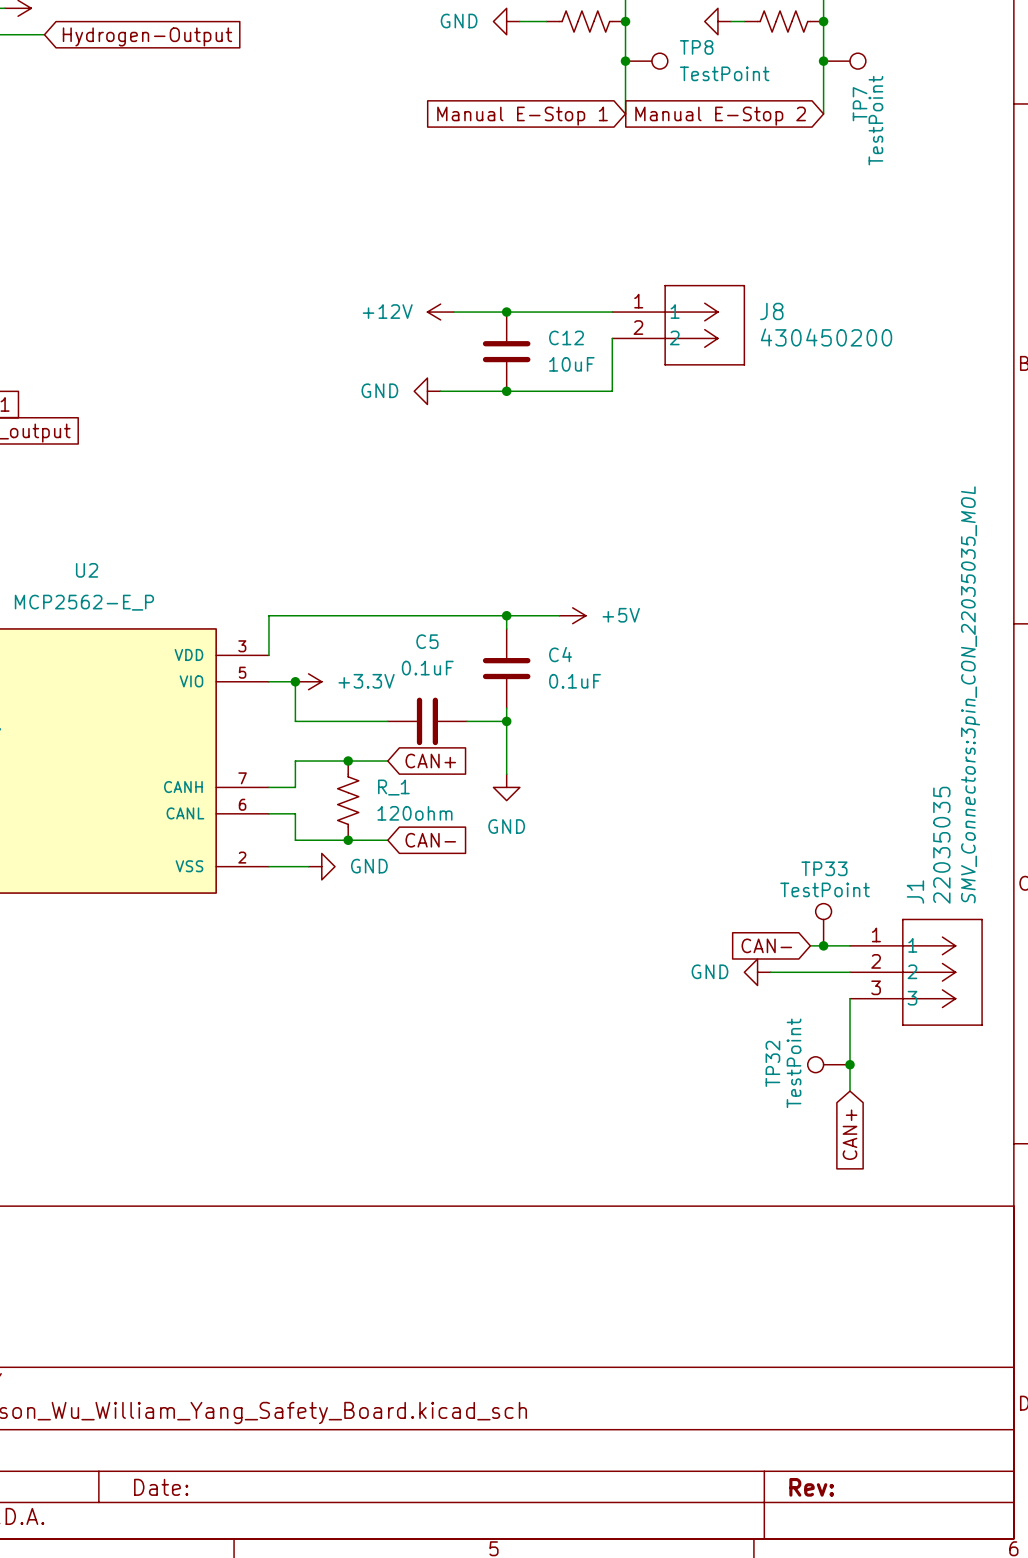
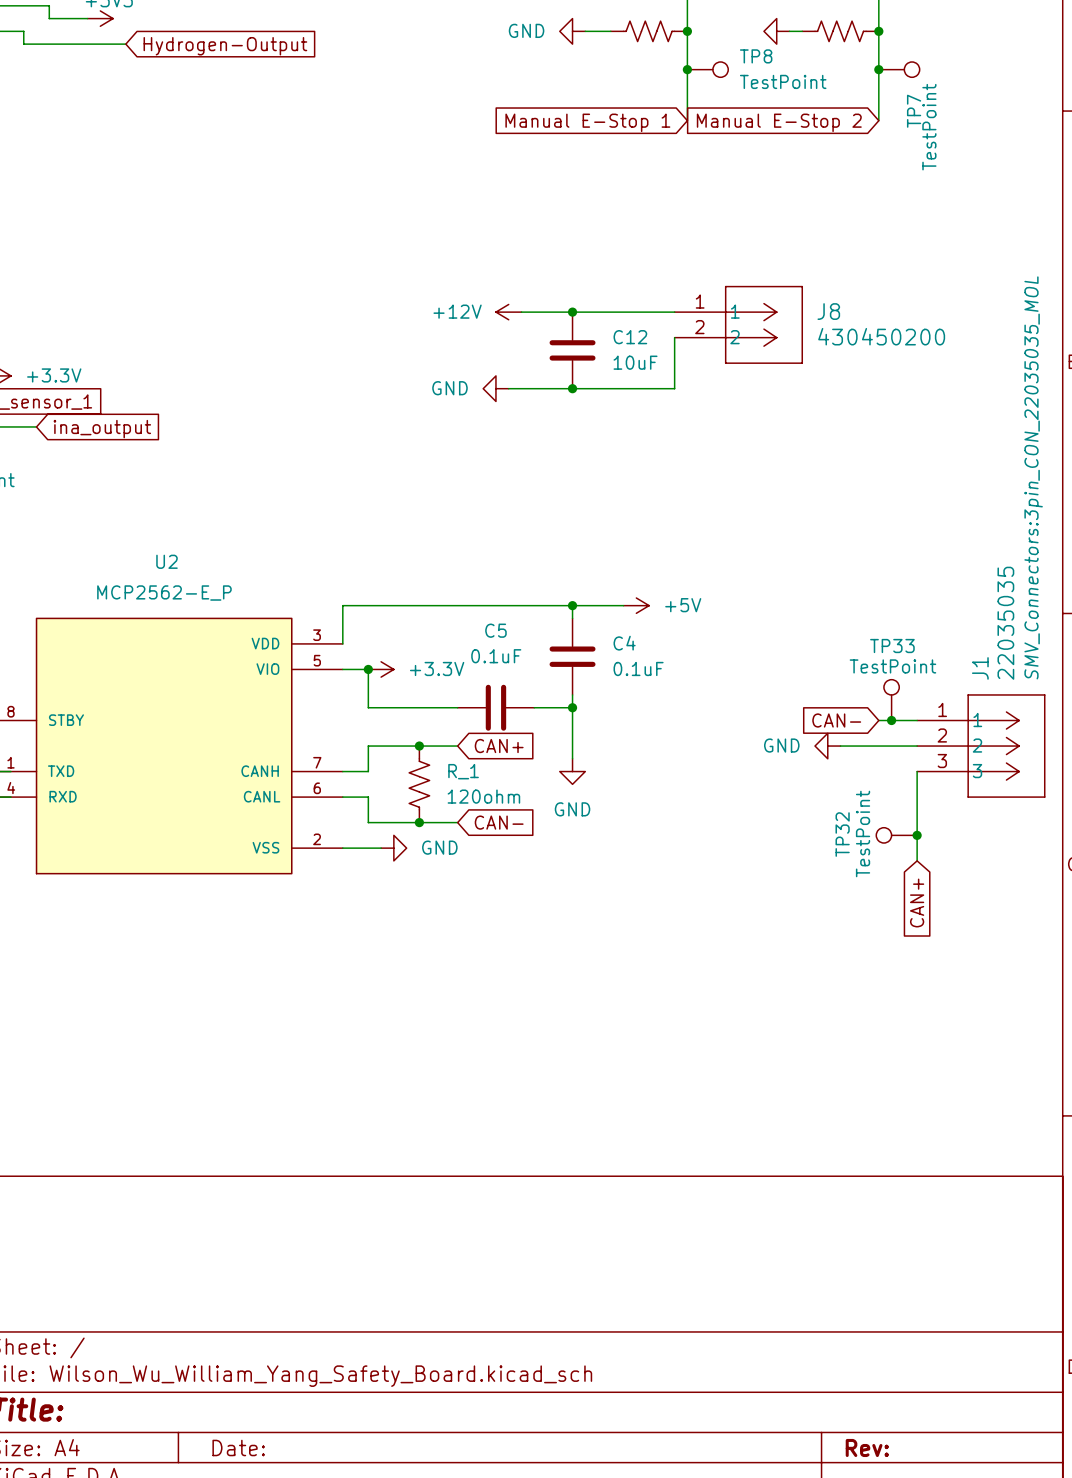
junction: none -> (891, 720)
junction: none -> (917, 835)
TP33 position: (823, 924) -> (891, 700)
global label position: CAN- (766, 945) -> CAN- (836, 720)
wire: (810, 945) (850, 945) -> (878, 720) (917, 720)
junction: (823, 945) -> none
power symbol position: GND (757, 972) -> GND (827, 746)
wire: (770, 972) (850, 972) -> (840, 746) (917, 746)
J1 position: (916, 972) -> (981, 746)
wire: (850, 998) (850, 1091) -> (917, 771) (917, 860)
TP32 position: (828, 1064) -> (896, 835)
junction: (850, 1064) -> none
global label position: CAN+ (850, 1134) -> CAN+ (917, 902)

